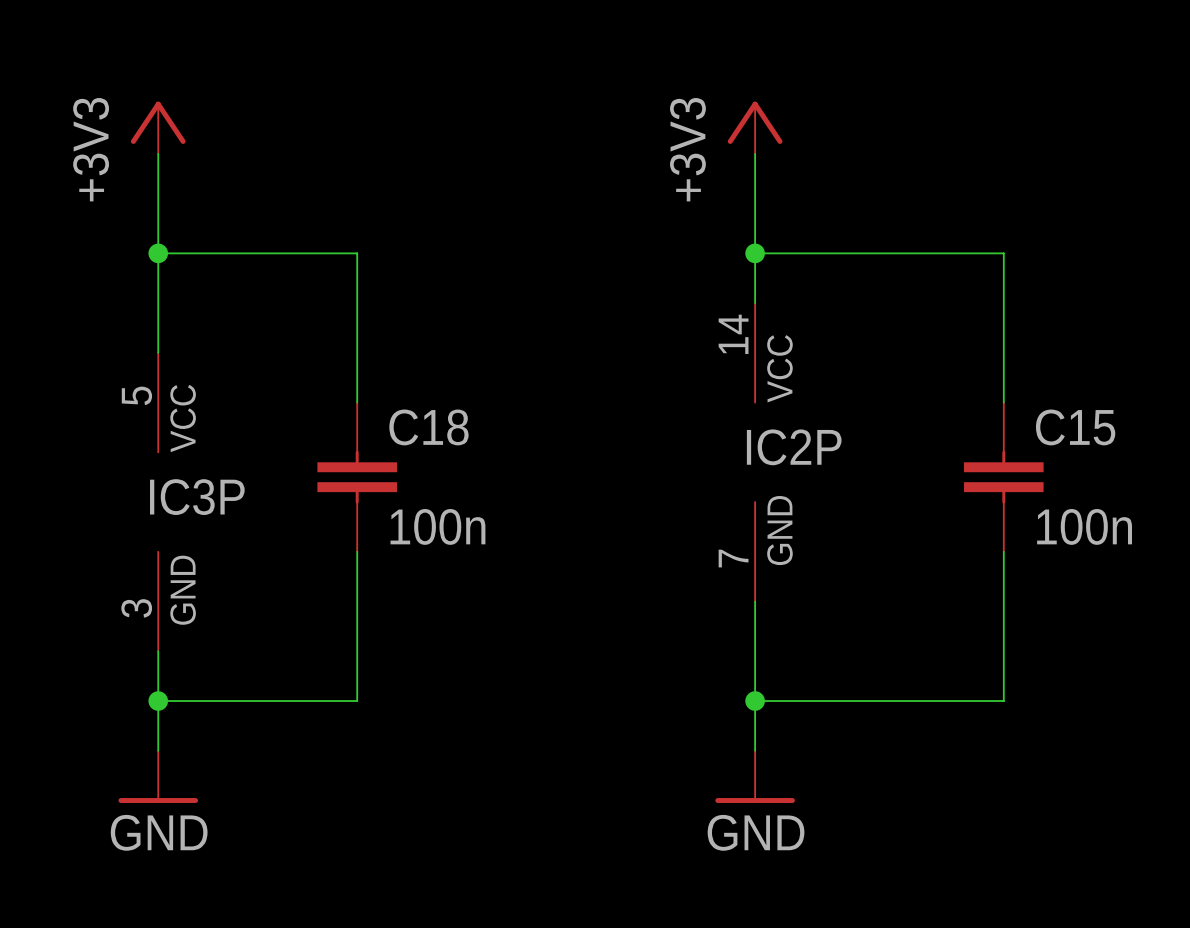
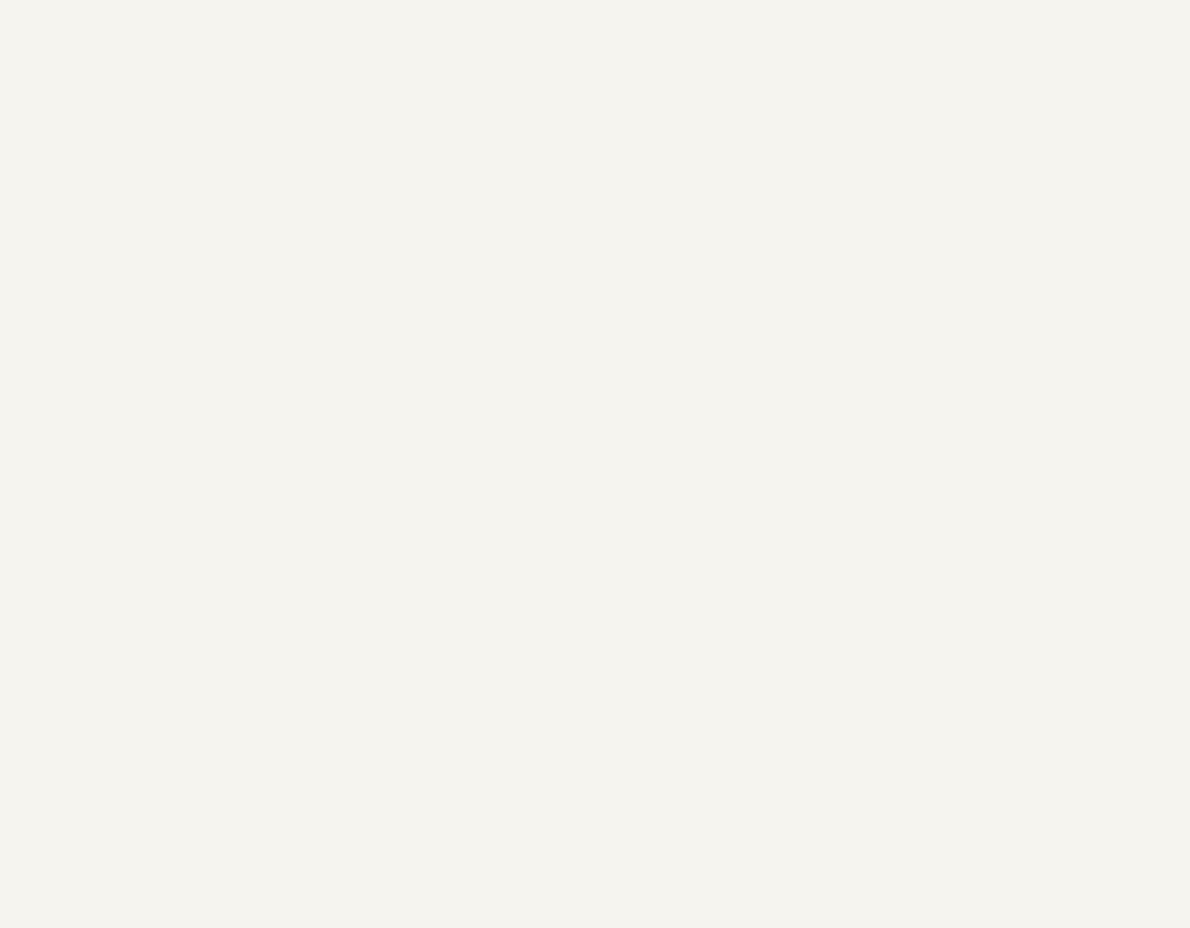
power symbol: +3V3 (158, 127) -> none
power symbol: +3V3 (755, 127) -> none
wire: (158, 153) (158, 352) -> none
wire: (755, 153) (755, 303) -> none
wire: (158, 253) (357, 253) (357, 402) -> none
junction: (158, 253) -> none
wire: (755, 253) (1003, 253) (1003, 402) -> none
junction: (755, 253) -> none
IC2P: (755, 452) -> none
C18: 100n (357, 477) -> none
C15: 100n (1003, 477) -> none
IC3P: (158, 502) -> none
wire: (357, 551) (357, 701) (158, 701) -> none
wire: (1003, 551) (1003, 701) (755, 701) -> none
wire: (755, 601) (755, 750) -> none
wire: (158, 651) (158, 750) -> none
junction: (158, 701) -> none
junction: (755, 701) -> none
power symbol: GND (158, 776) -> none
power symbol: GND (755, 776) -> none

